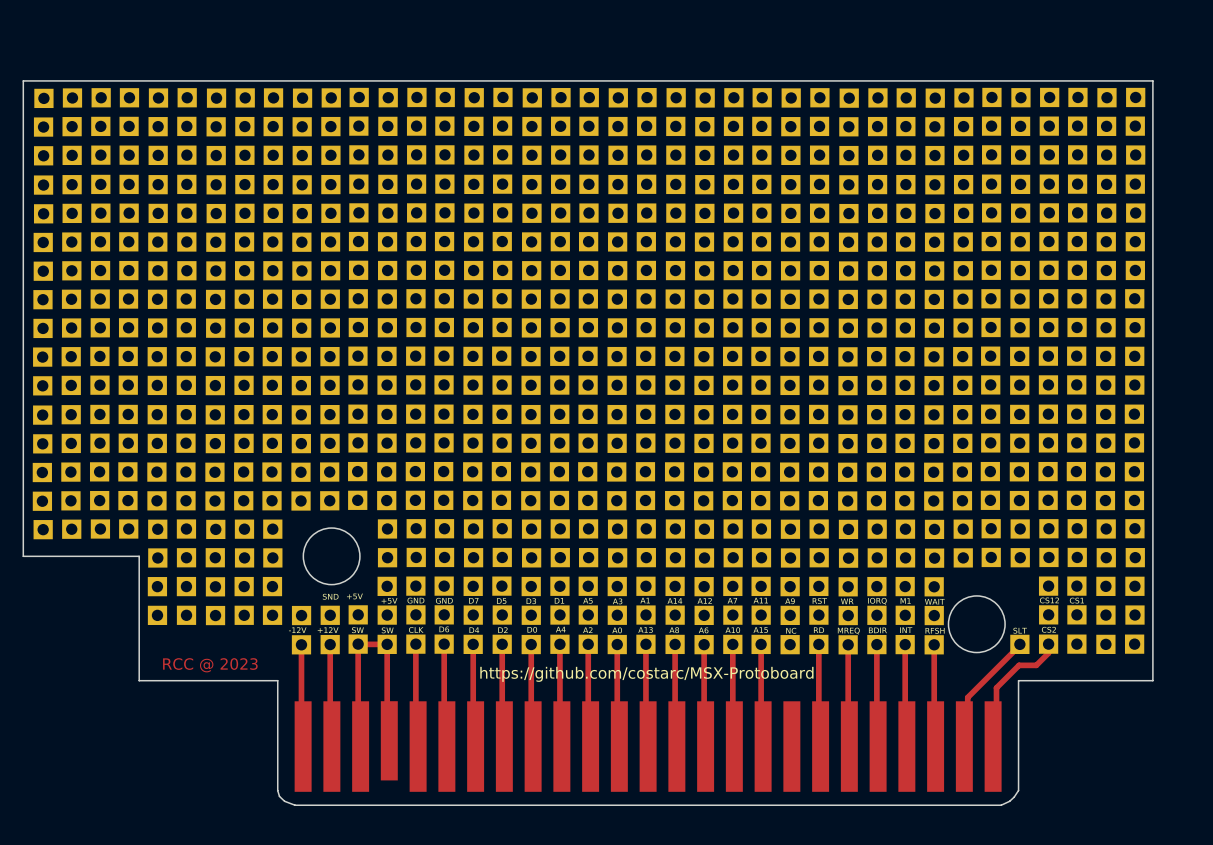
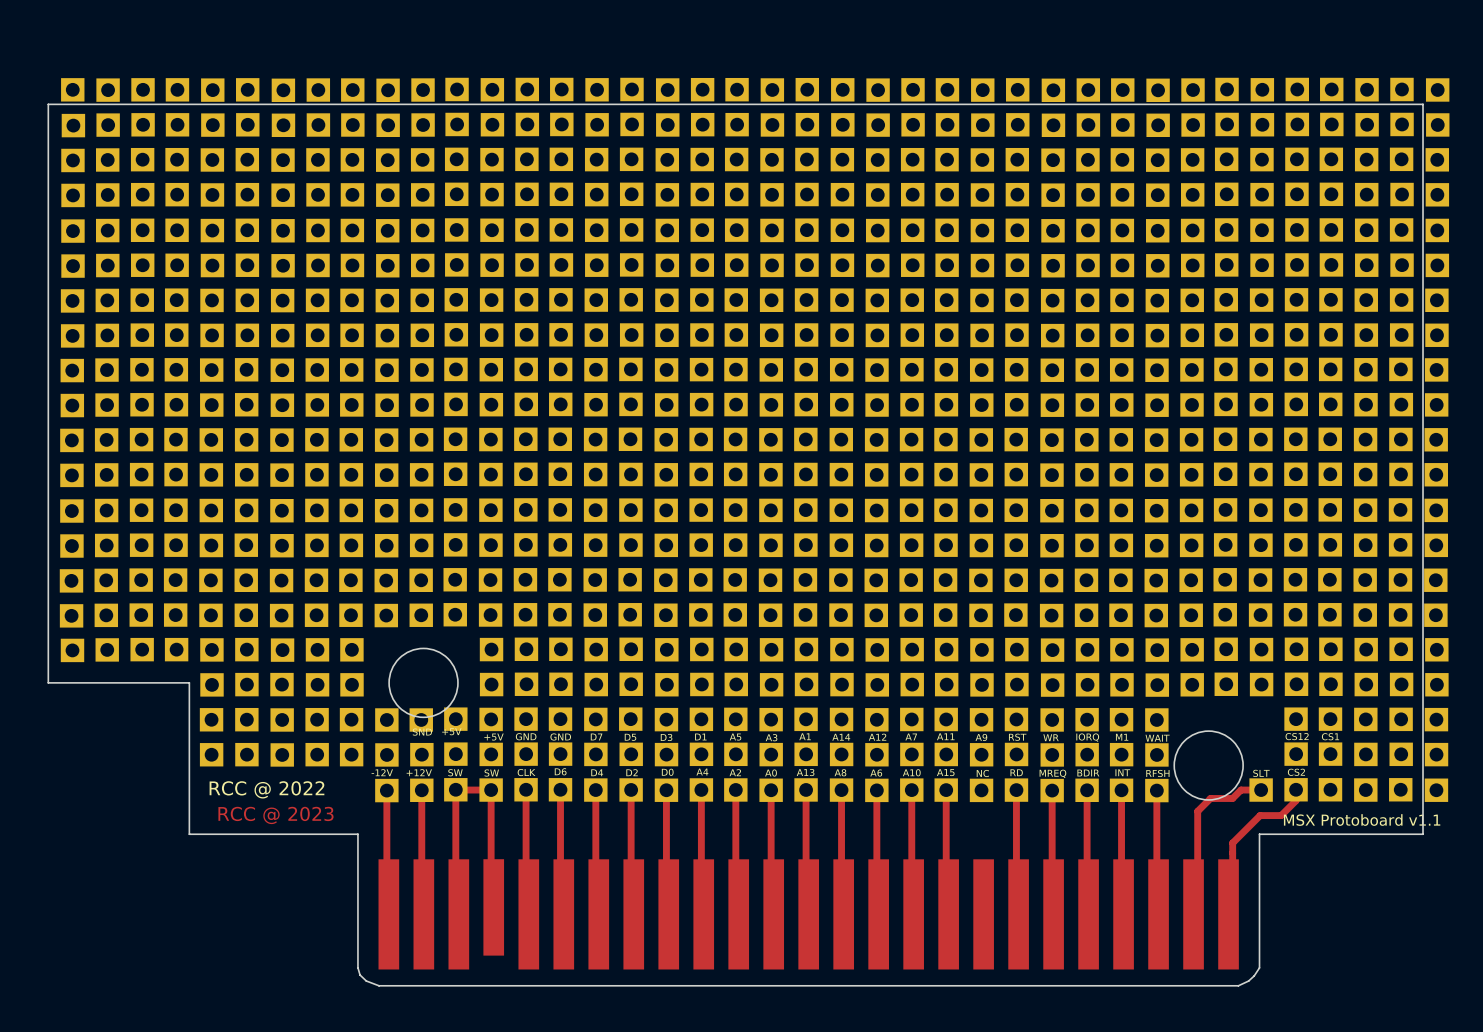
part: none -> (457, 89)
part: none -> (492, 89)
part: none -> (527, 89)
part: none -> (561, 89)
part: none -> (597, 89)
part: none -> (631, 89)
part: none -> (702, 89)
part: none -> (737, 89)
part: none -> (807, 89)
part: none -> (1227, 89)
part: none -> (1262, 89)
part: none -> (1297, 89)
part: none -> (1331, 89)
part: none -> (1367, 89)
part: none -> (1401, 89)
part: none -> (72, 89)
part: none -> (108, 90)
part: none -> (143, 89)
part: none -> (177, 89)
part: none -> (212, 90)
part: none -> (247, 89)
part: none -> (283, 90)
part: none -> (318, 90)
part: none -> (352, 90)
part: none -> (388, 90)
part: none -> (423, 90)
part: none -> (667, 89)
part: none -> (772, 89)
part: none -> (842, 89)
part: none -> (878, 90)
part: none -> (913, 89)
part: none -> (947, 89)
part: none -> (982, 90)
part: none -> (1017, 89)
part: none -> (1053, 90)
part: none -> (1088, 90)
part: none -> (1122, 90)
part: none -> (1158, 90)
part: none -> (1193, 90)
part: none -> (1437, 89)
part: none -> (1437, 124)
part: none -> (1437, 159)
part: none -> (1437, 194)
part: none -> (1437, 230)
part: none -> (1437, 265)
part: none -> (1436, 300)
part: none -> (1436, 335)
part: none -> (1436, 369)
part: none -> (1436, 404)
part: none -> (1436, 439)
part: none -> (1436, 474)
part: none -> (1436, 510)
part: none -> (1436, 545)
part: none -> (1435, 580)
part: none -> (1435, 615)
part: none -> (1436, 649)
part: none -> (1436, 684)
part: none -> (386, 719)
part: none -> (421, 719)
part: none -> (455, 719)
part: none -> (1436, 719)
part: none -> (1436, 754)
text: none -> RCC @ 2022 (266, 789)
track: (1019, 644) (967, 697) -> (1261, 790) (1241, 790) (1232, 798) (1210, 798) (1197, 811) (1197, 854)
part: none -> (1436, 790)
text: none -> MSX Protoboard v1.1 (1362, 820)
text: https://github.com/costarc/MSX-Protoboard (646, 674) -> none

